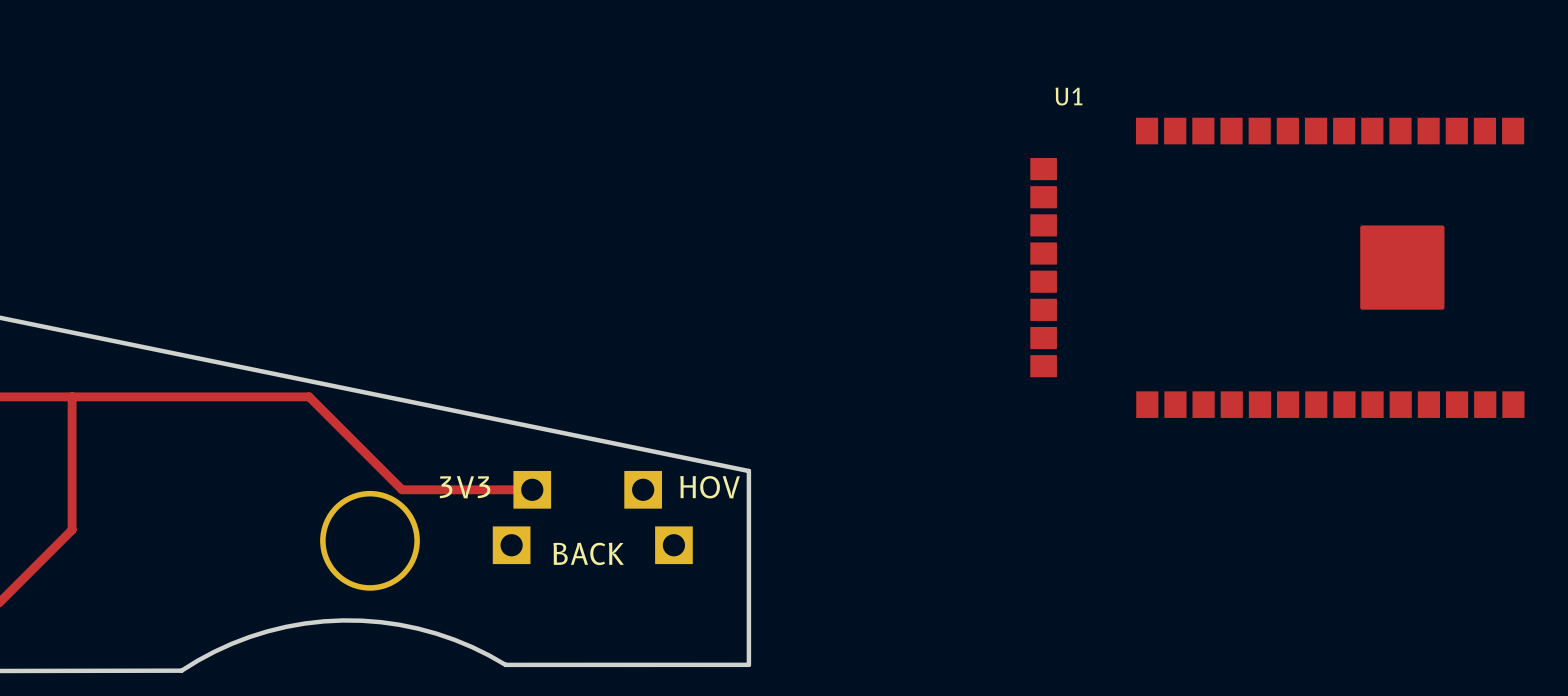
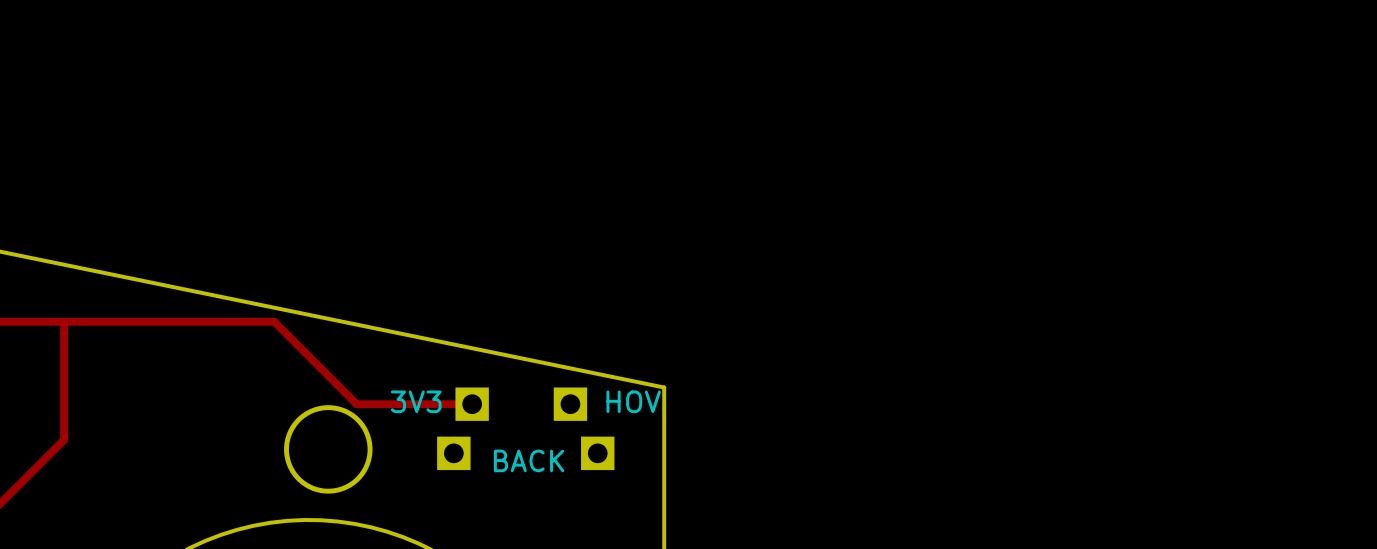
U1: (1277, 267) -> none

